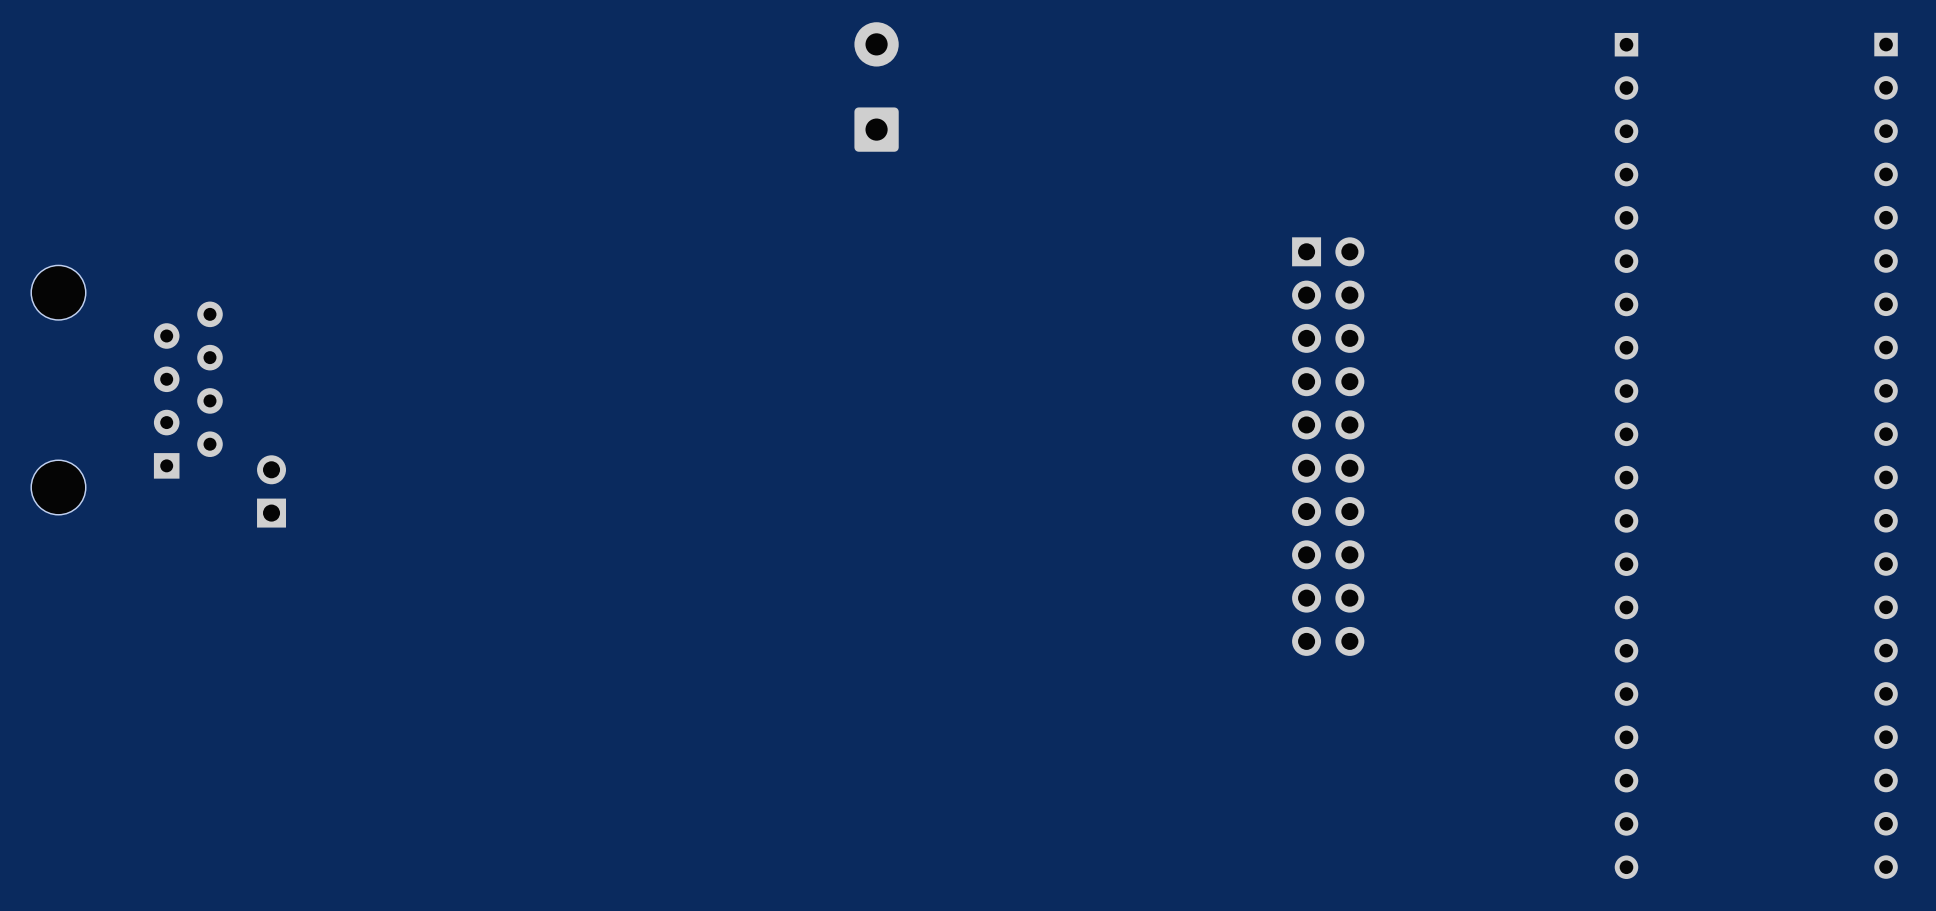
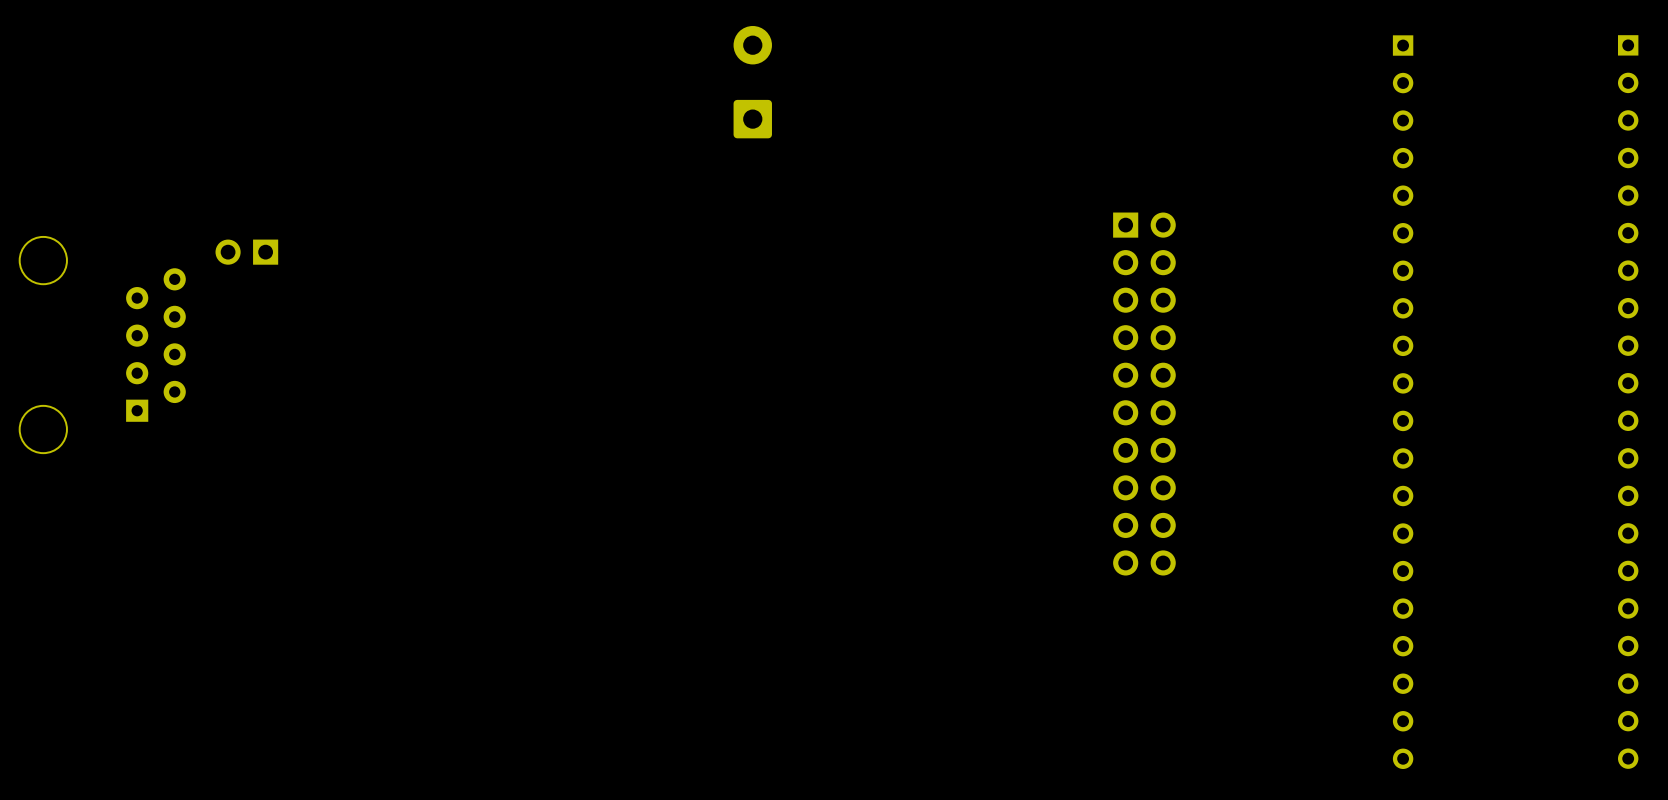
part rotation: 0° (271, 491) -> 90° counterclockwise (246, 252)
part position: (271, 491) -> (246, 252)

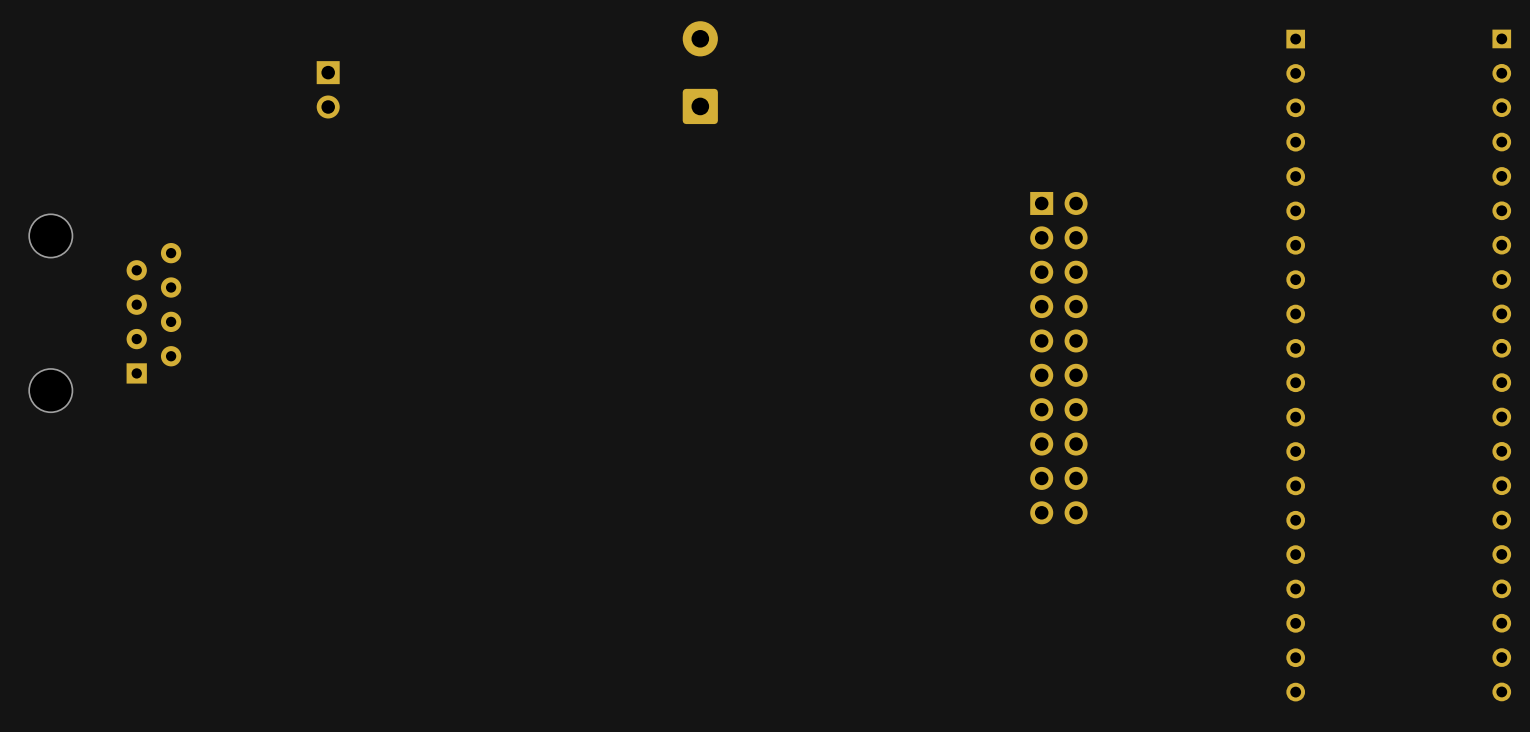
part rotation: 0° (246, 252) -> 90° counterclockwise (328, 89)
part position: (246, 252) -> (328, 89)

